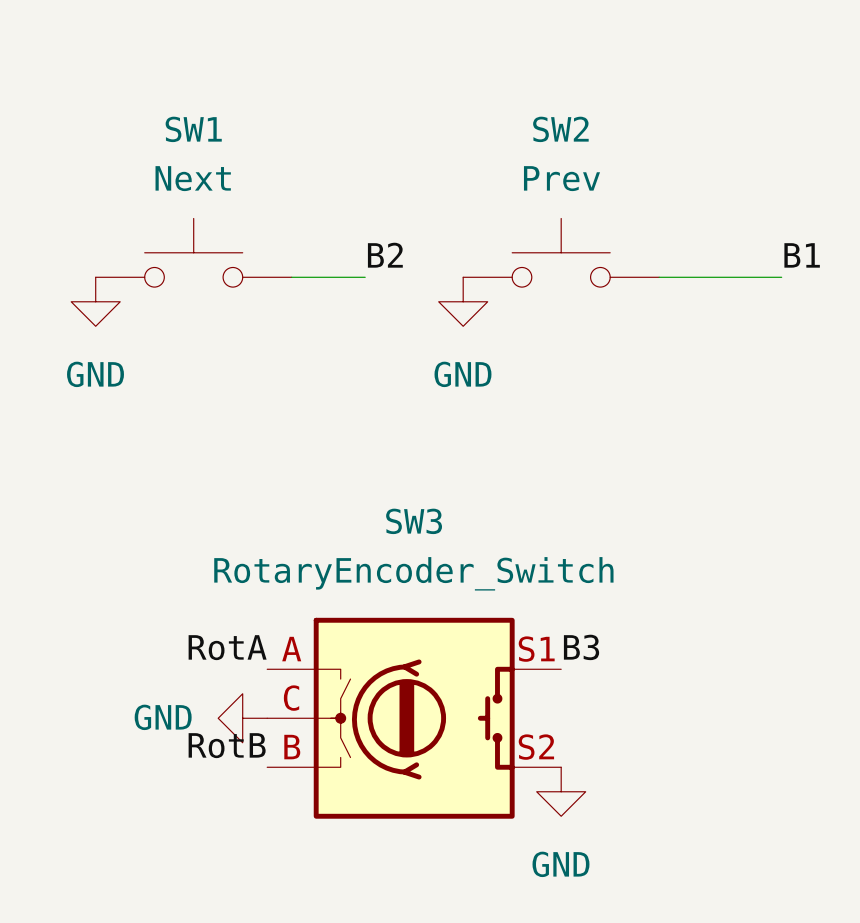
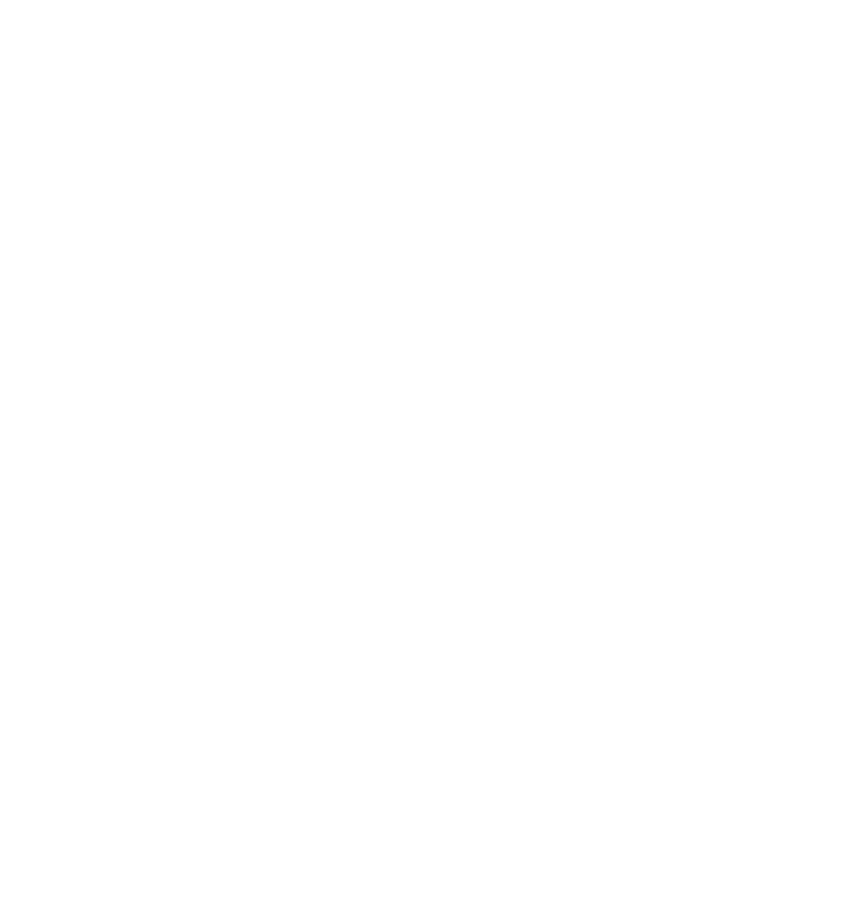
SW1: Next (193, 252) -> none
SW2: Prev (561, 252) -> none
label: B2 (385, 255) -> none
label: B1 (802, 255) -> none
wire: (291, 277) (365, 277) -> none
wire: (659, 277) (781, 277) -> none
power symbol: GND (95, 301) -> none
power symbol: GND (463, 301) -> none
label: RotA (227, 647) -> none
label: B3 (581, 647) -> none
power symbol: GND (242, 718) -> none
SW3: RotaryEncoder_Switch (414, 718) -> none
label: RotB (227, 745) -> none
power symbol: GND (561, 791) -> none

